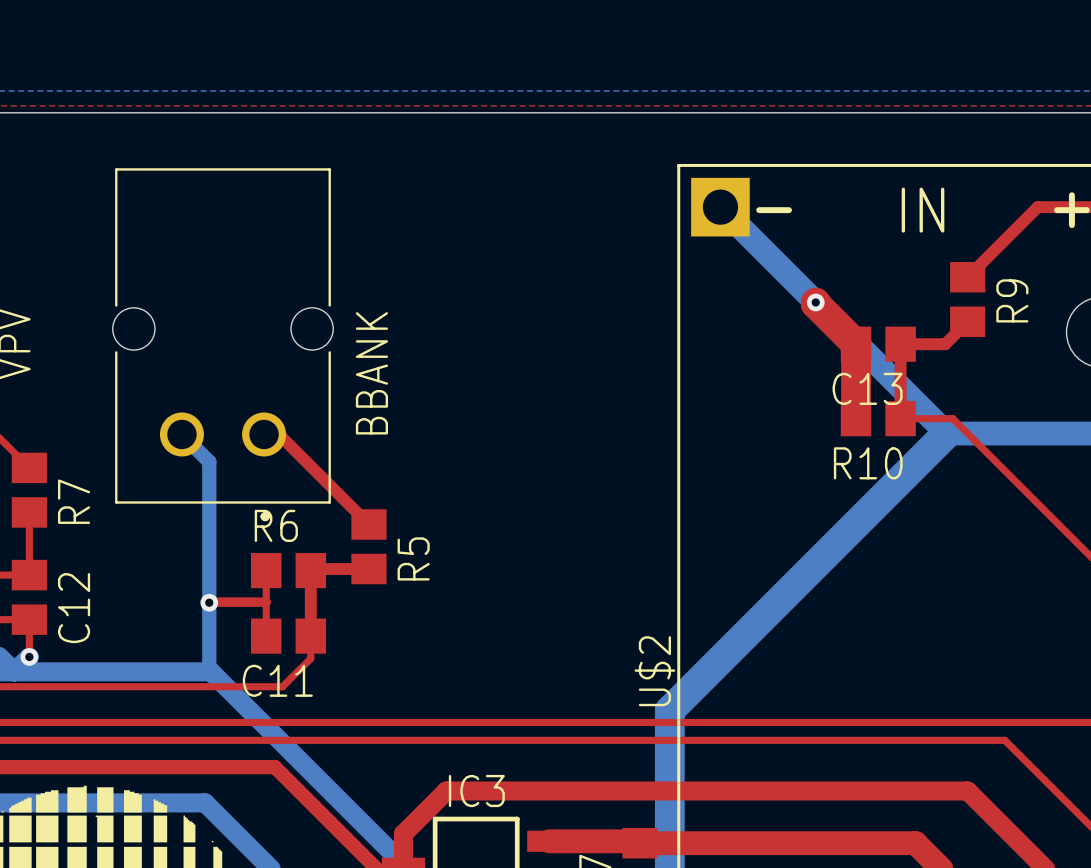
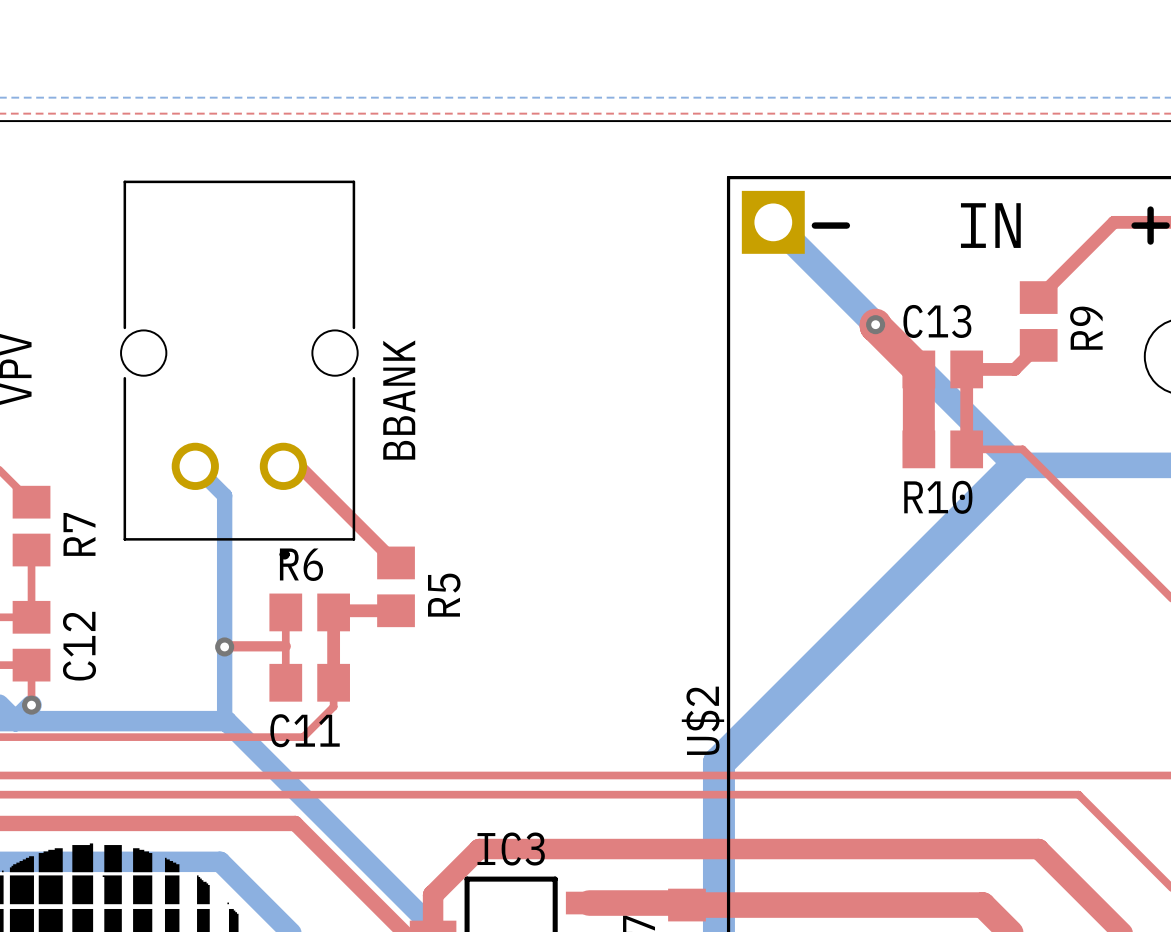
C13 name position: C13 (867, 388) -> C13 (937, 321)

